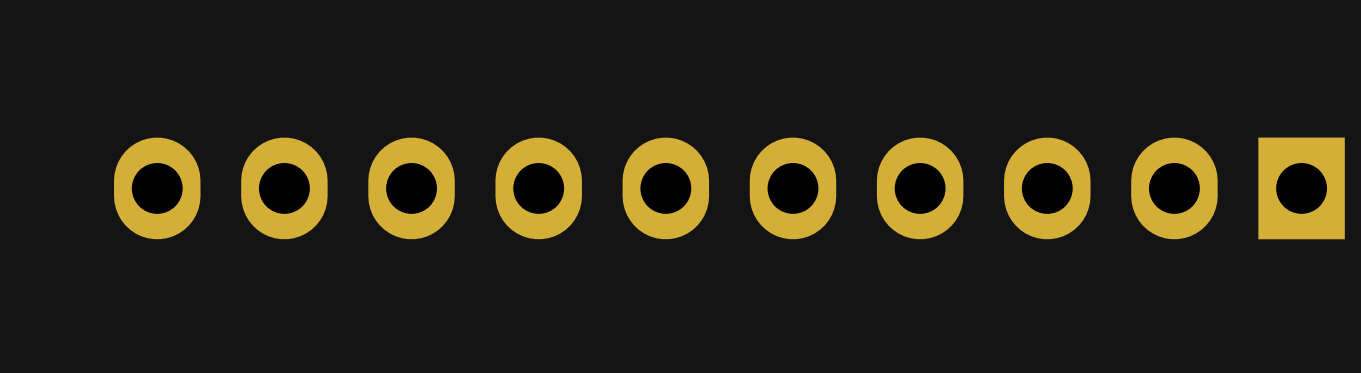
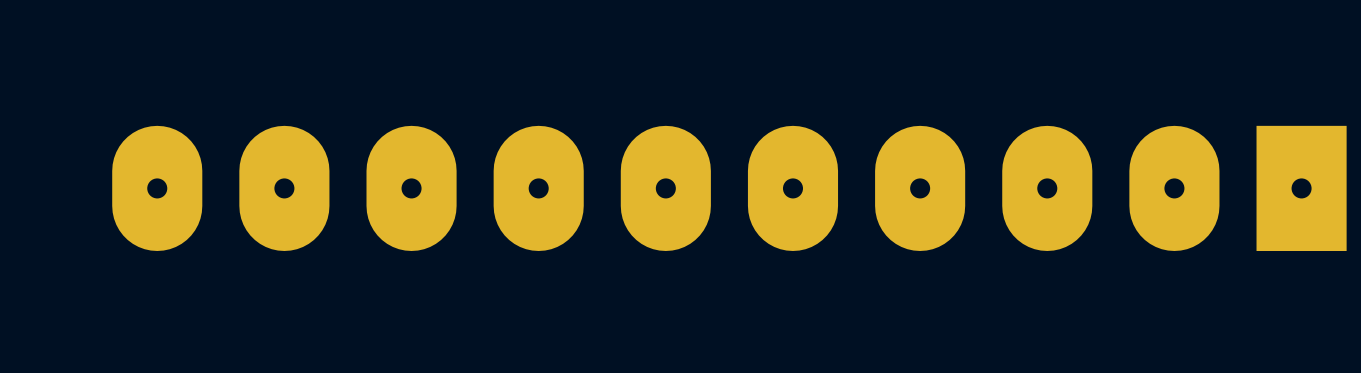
part footprint: [114, 137, 1345, 240] -> [112, 125, 1347, 252]

